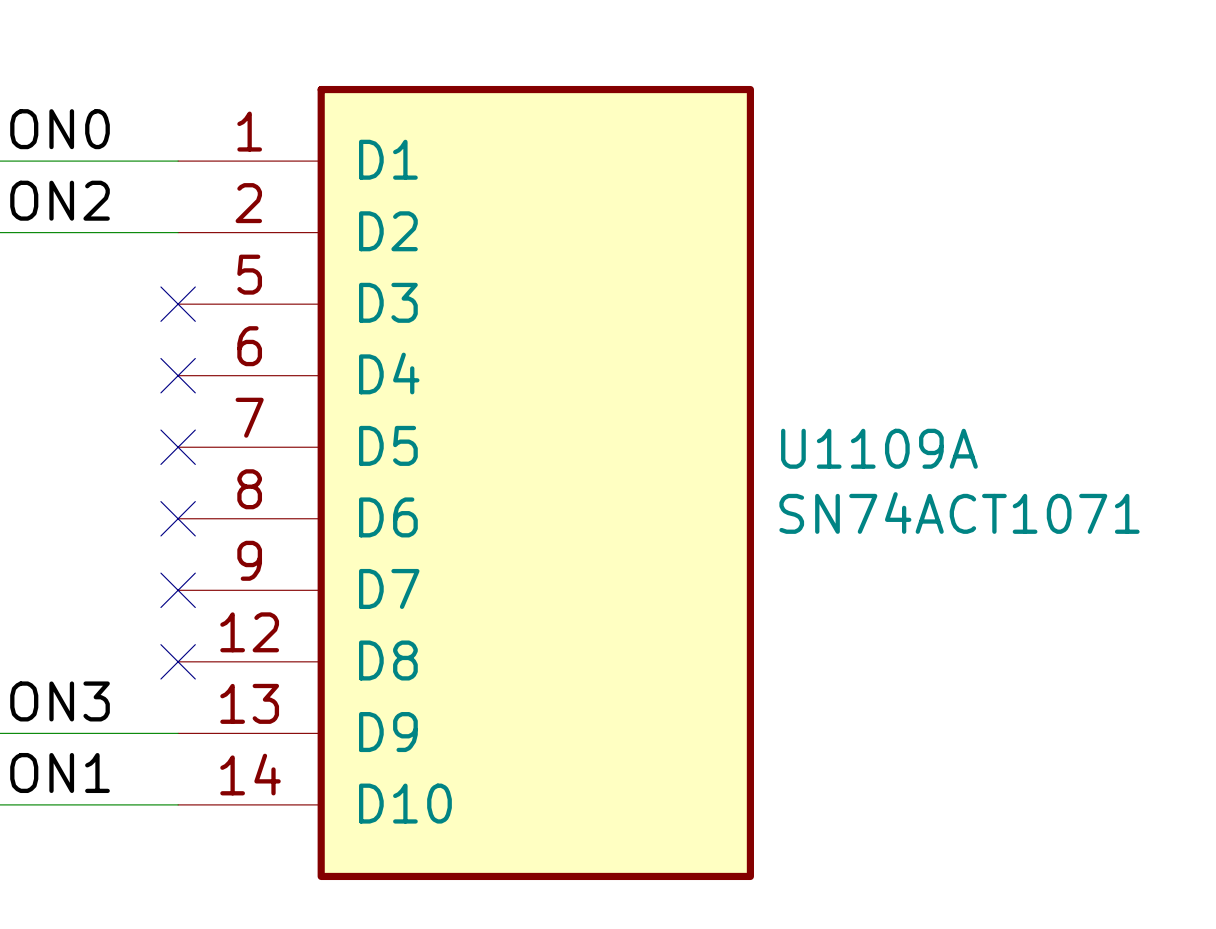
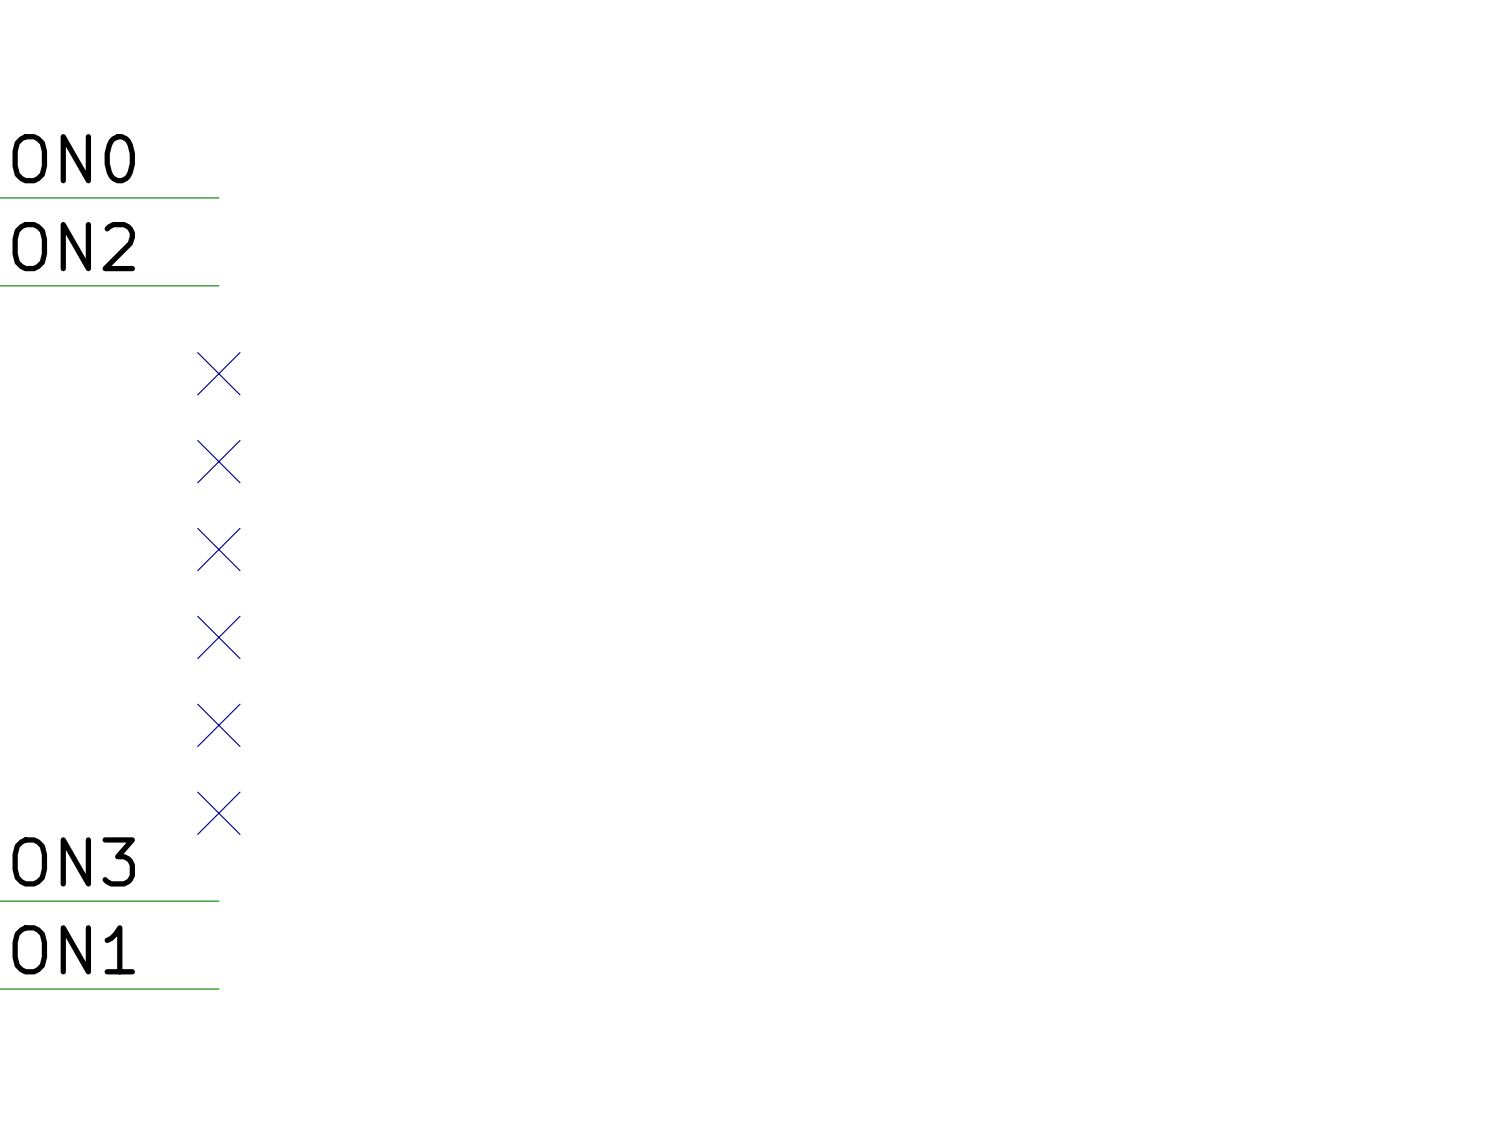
U1109A: SN74ACT1071 (466, 483) -> none

